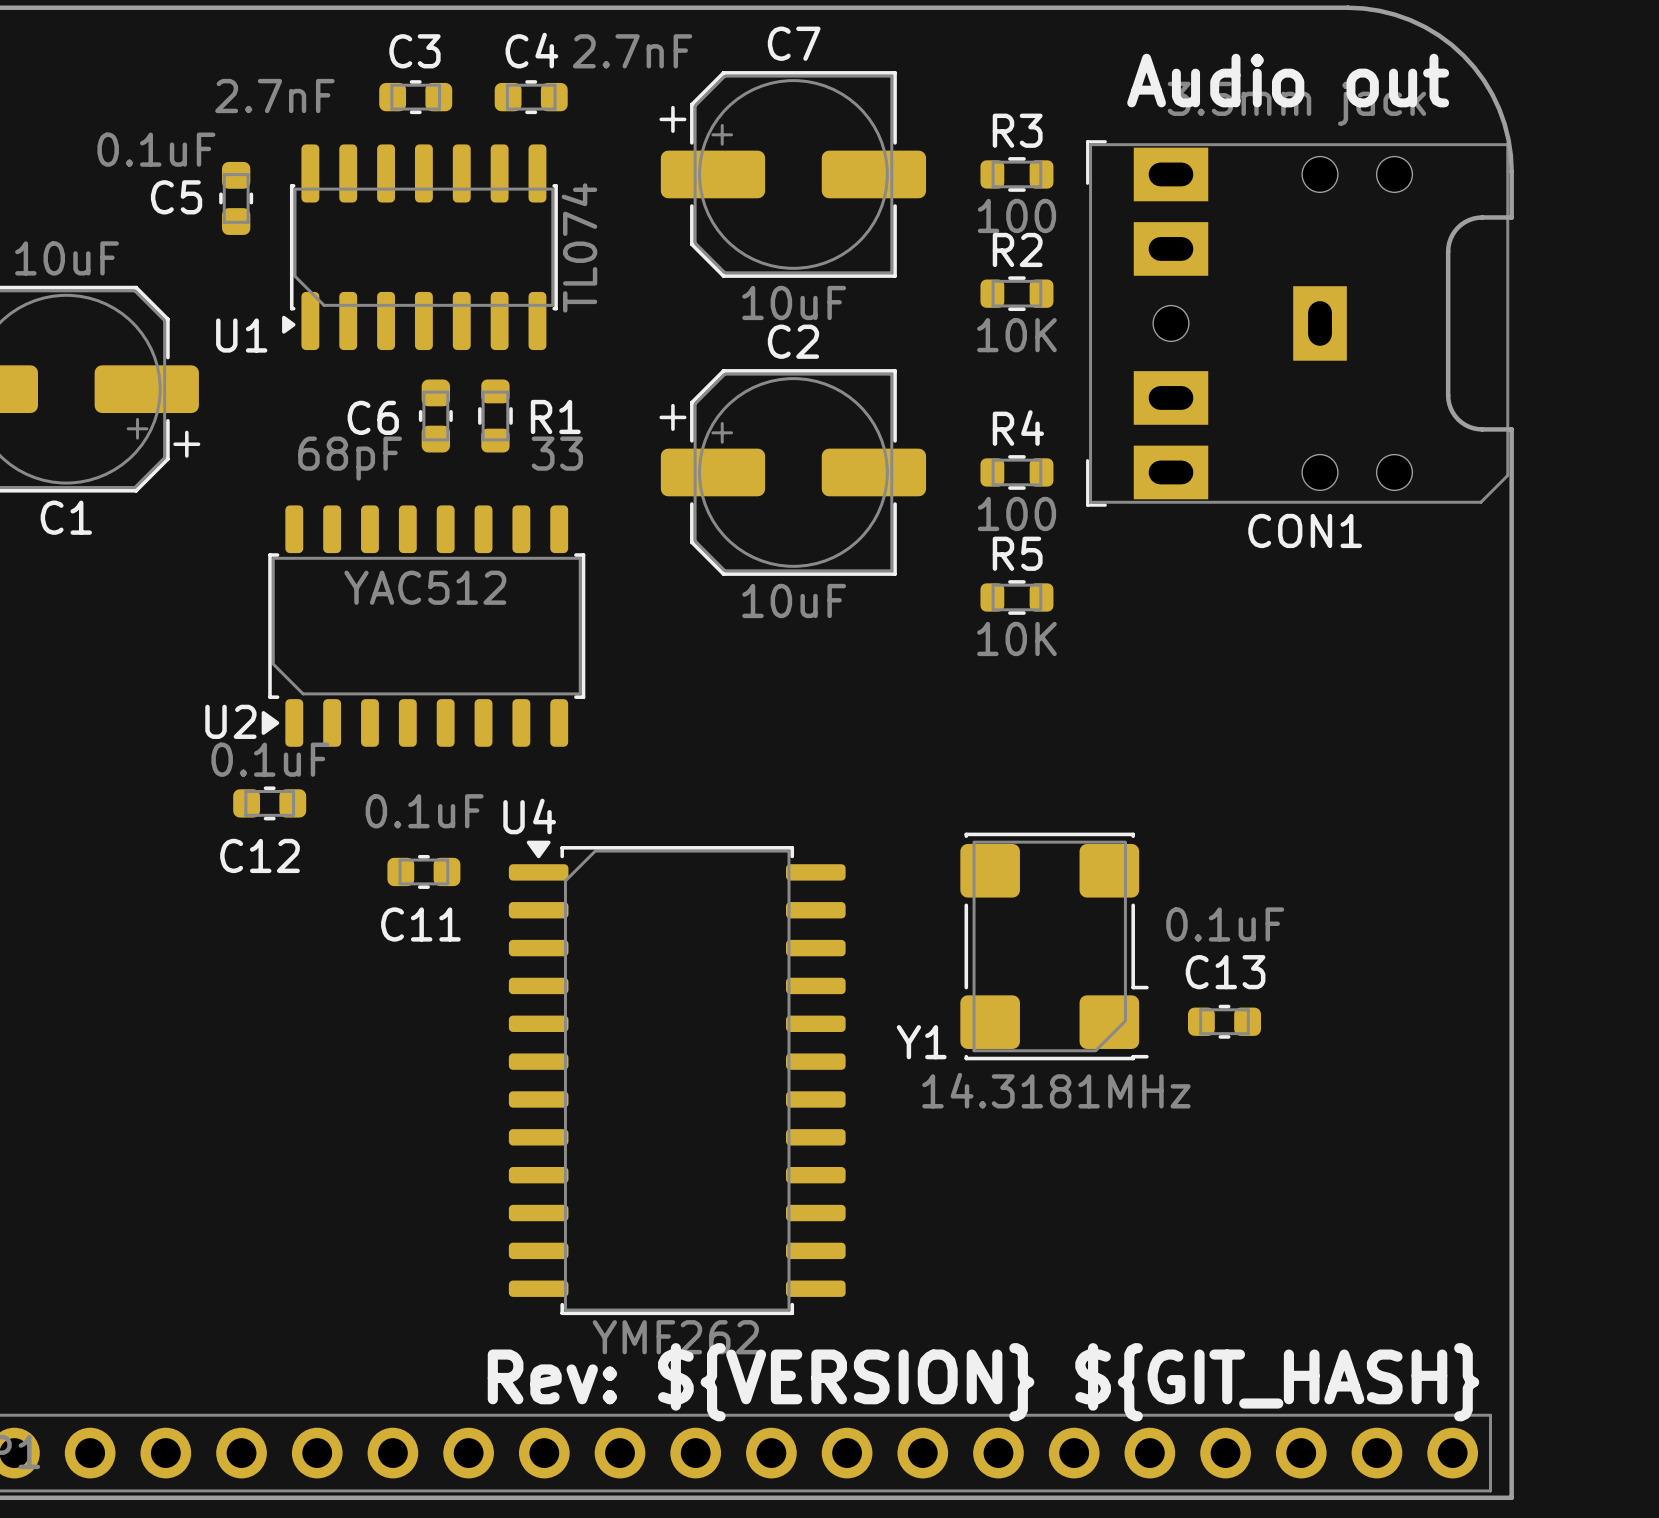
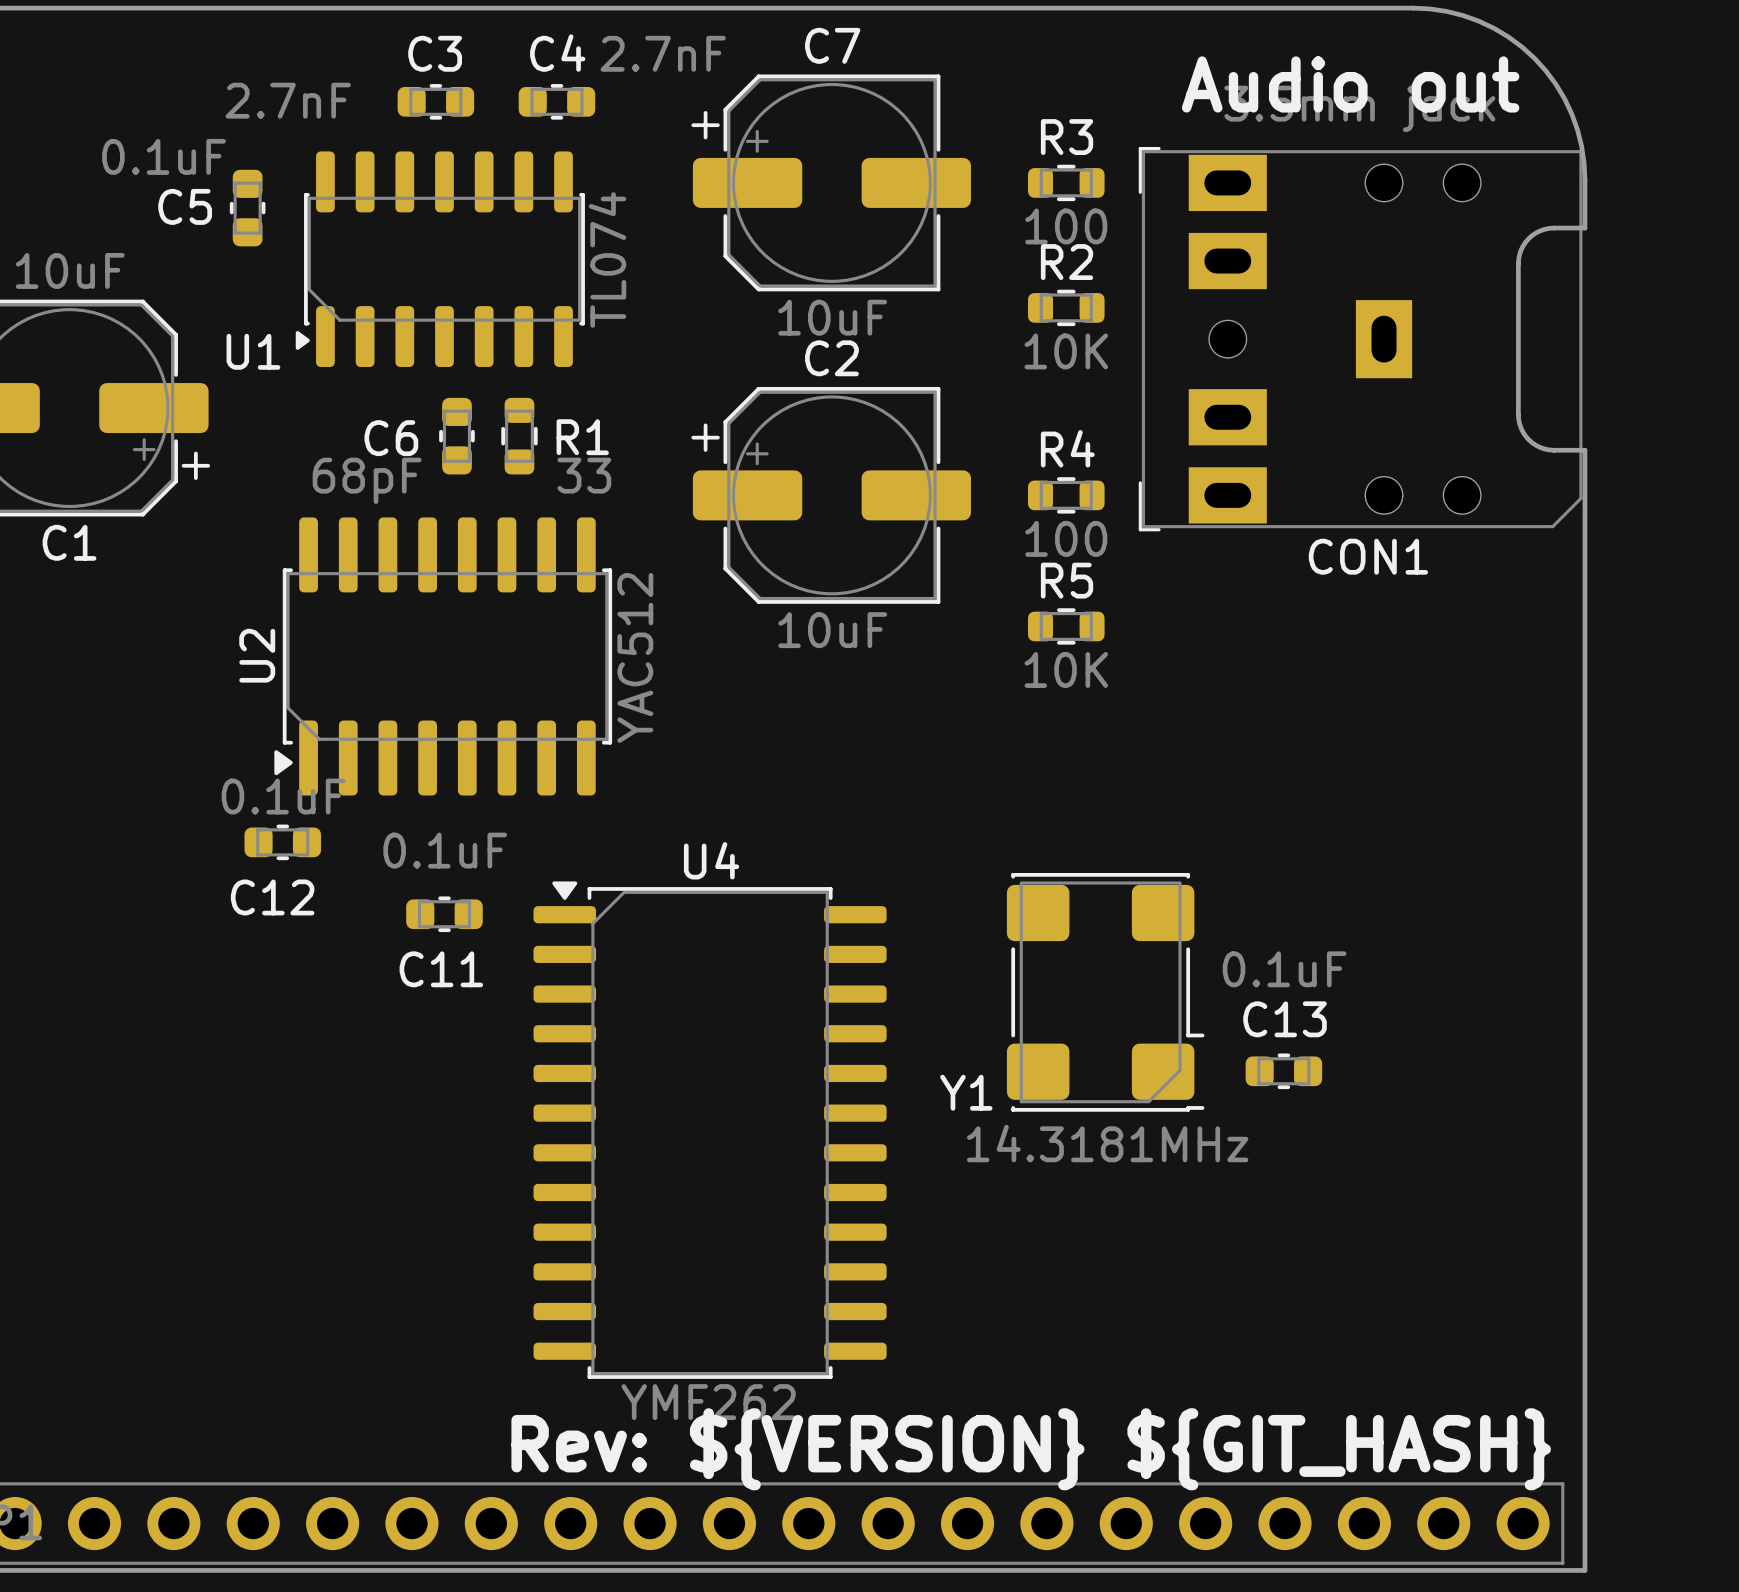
U2 footprint: [261, 505, 586, 747] -> [274, 517, 613, 796]
U2 value rotation: 0° (425, 587) -> 90° counterclockwise (635, 657)
U2 name rotation: 0° (230, 721) -> 90° counterclockwise (257, 655)
U2 name position: U2 (230, 721) -> U2 (257, 655)
U4 name position: U4 (529, 816) -> U4 (711, 860)

